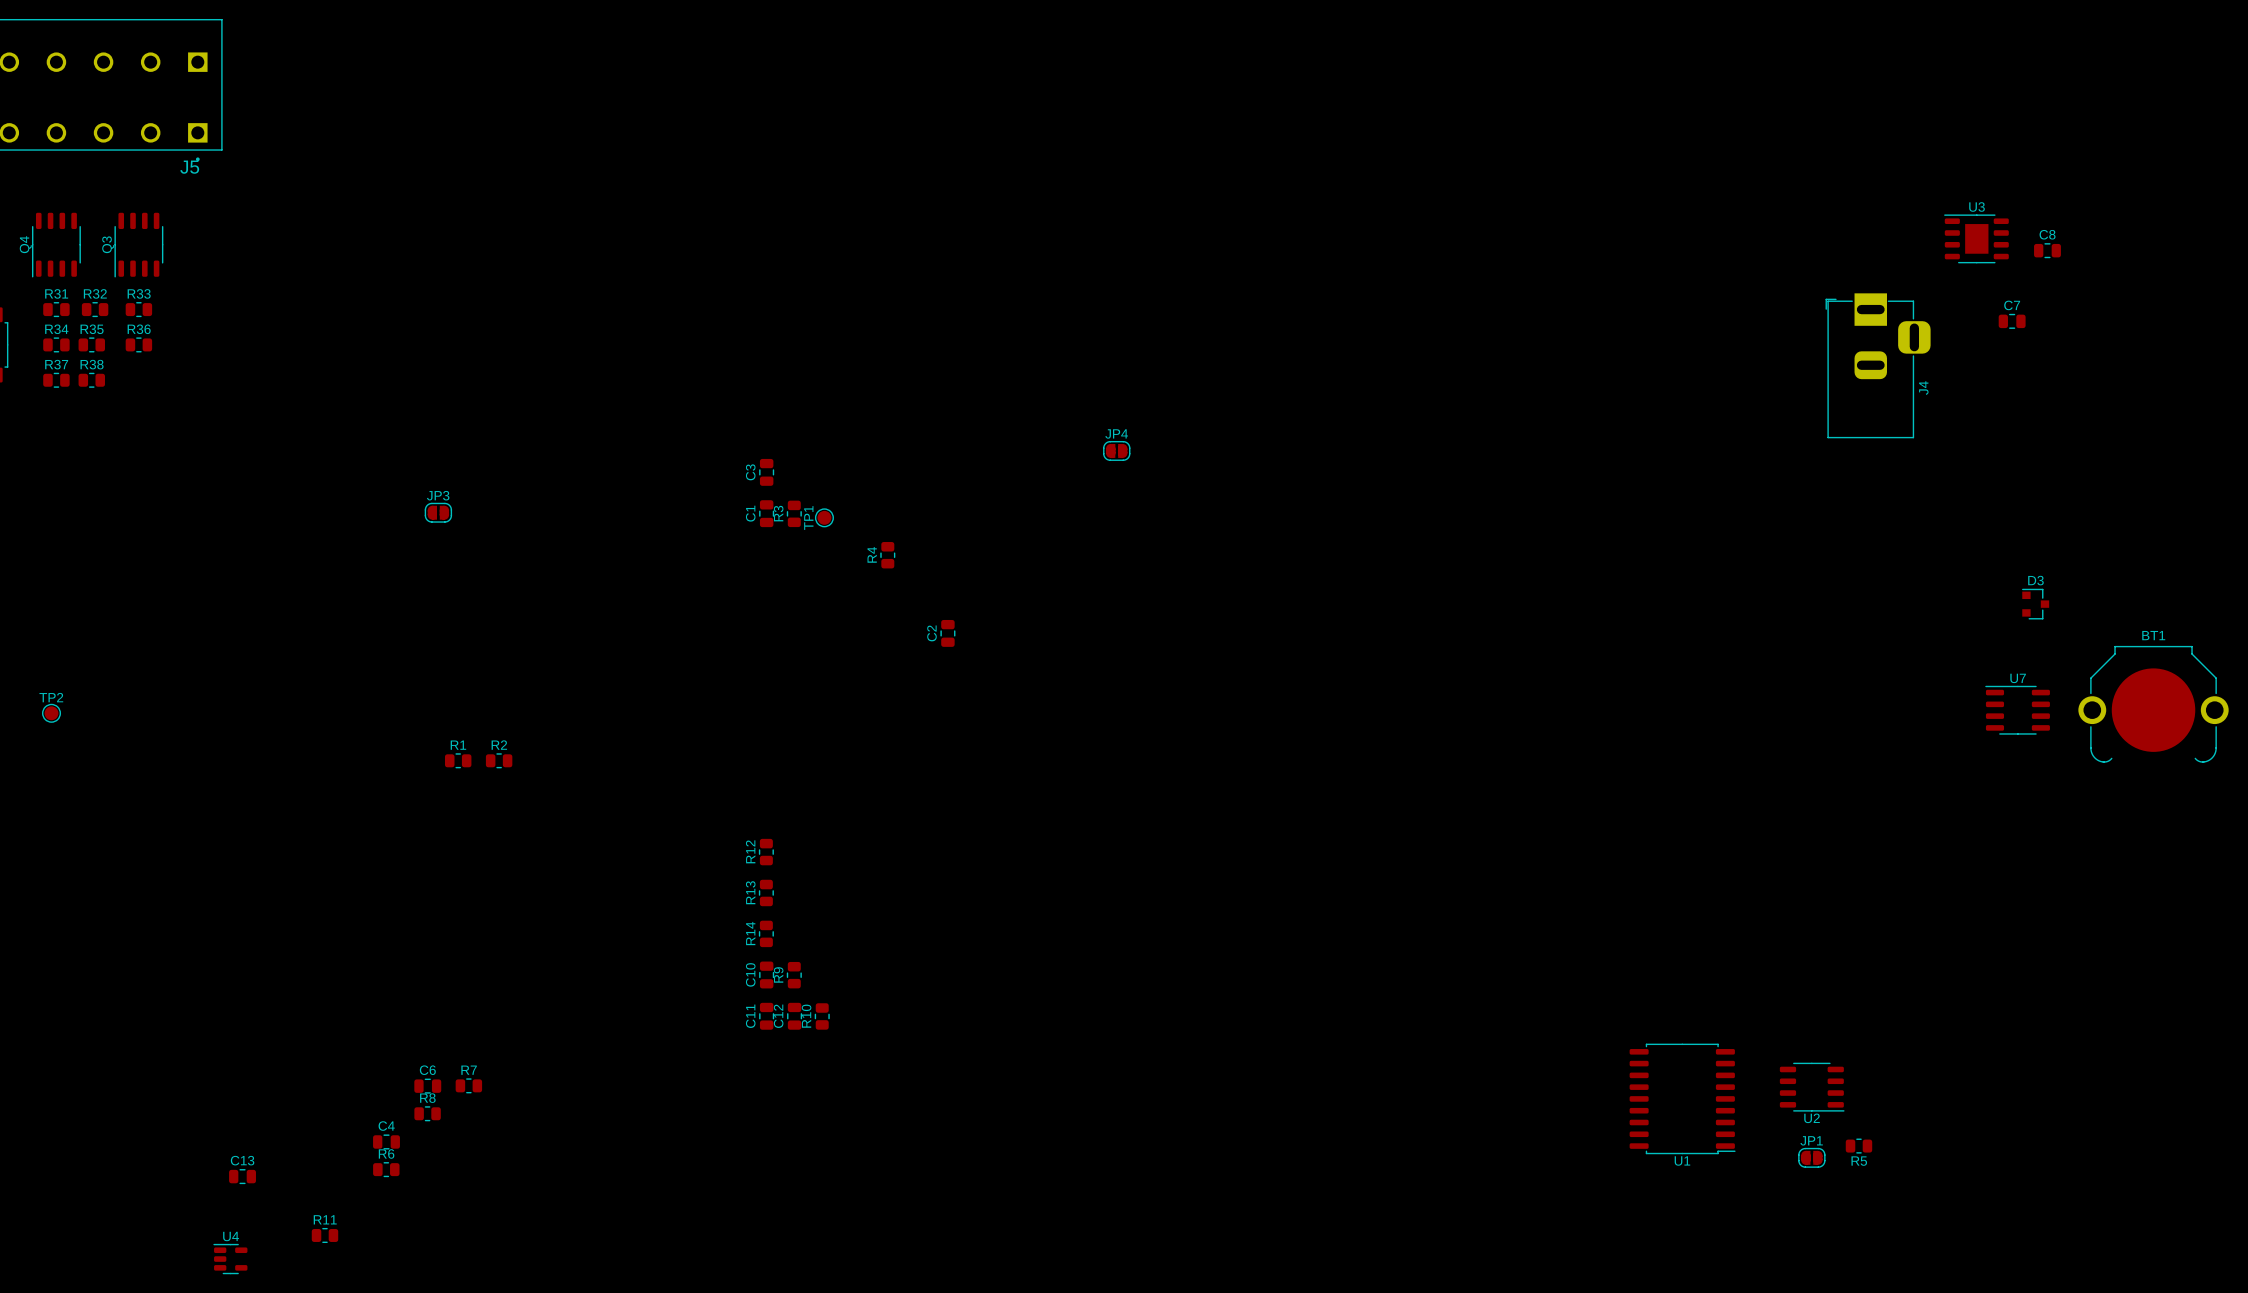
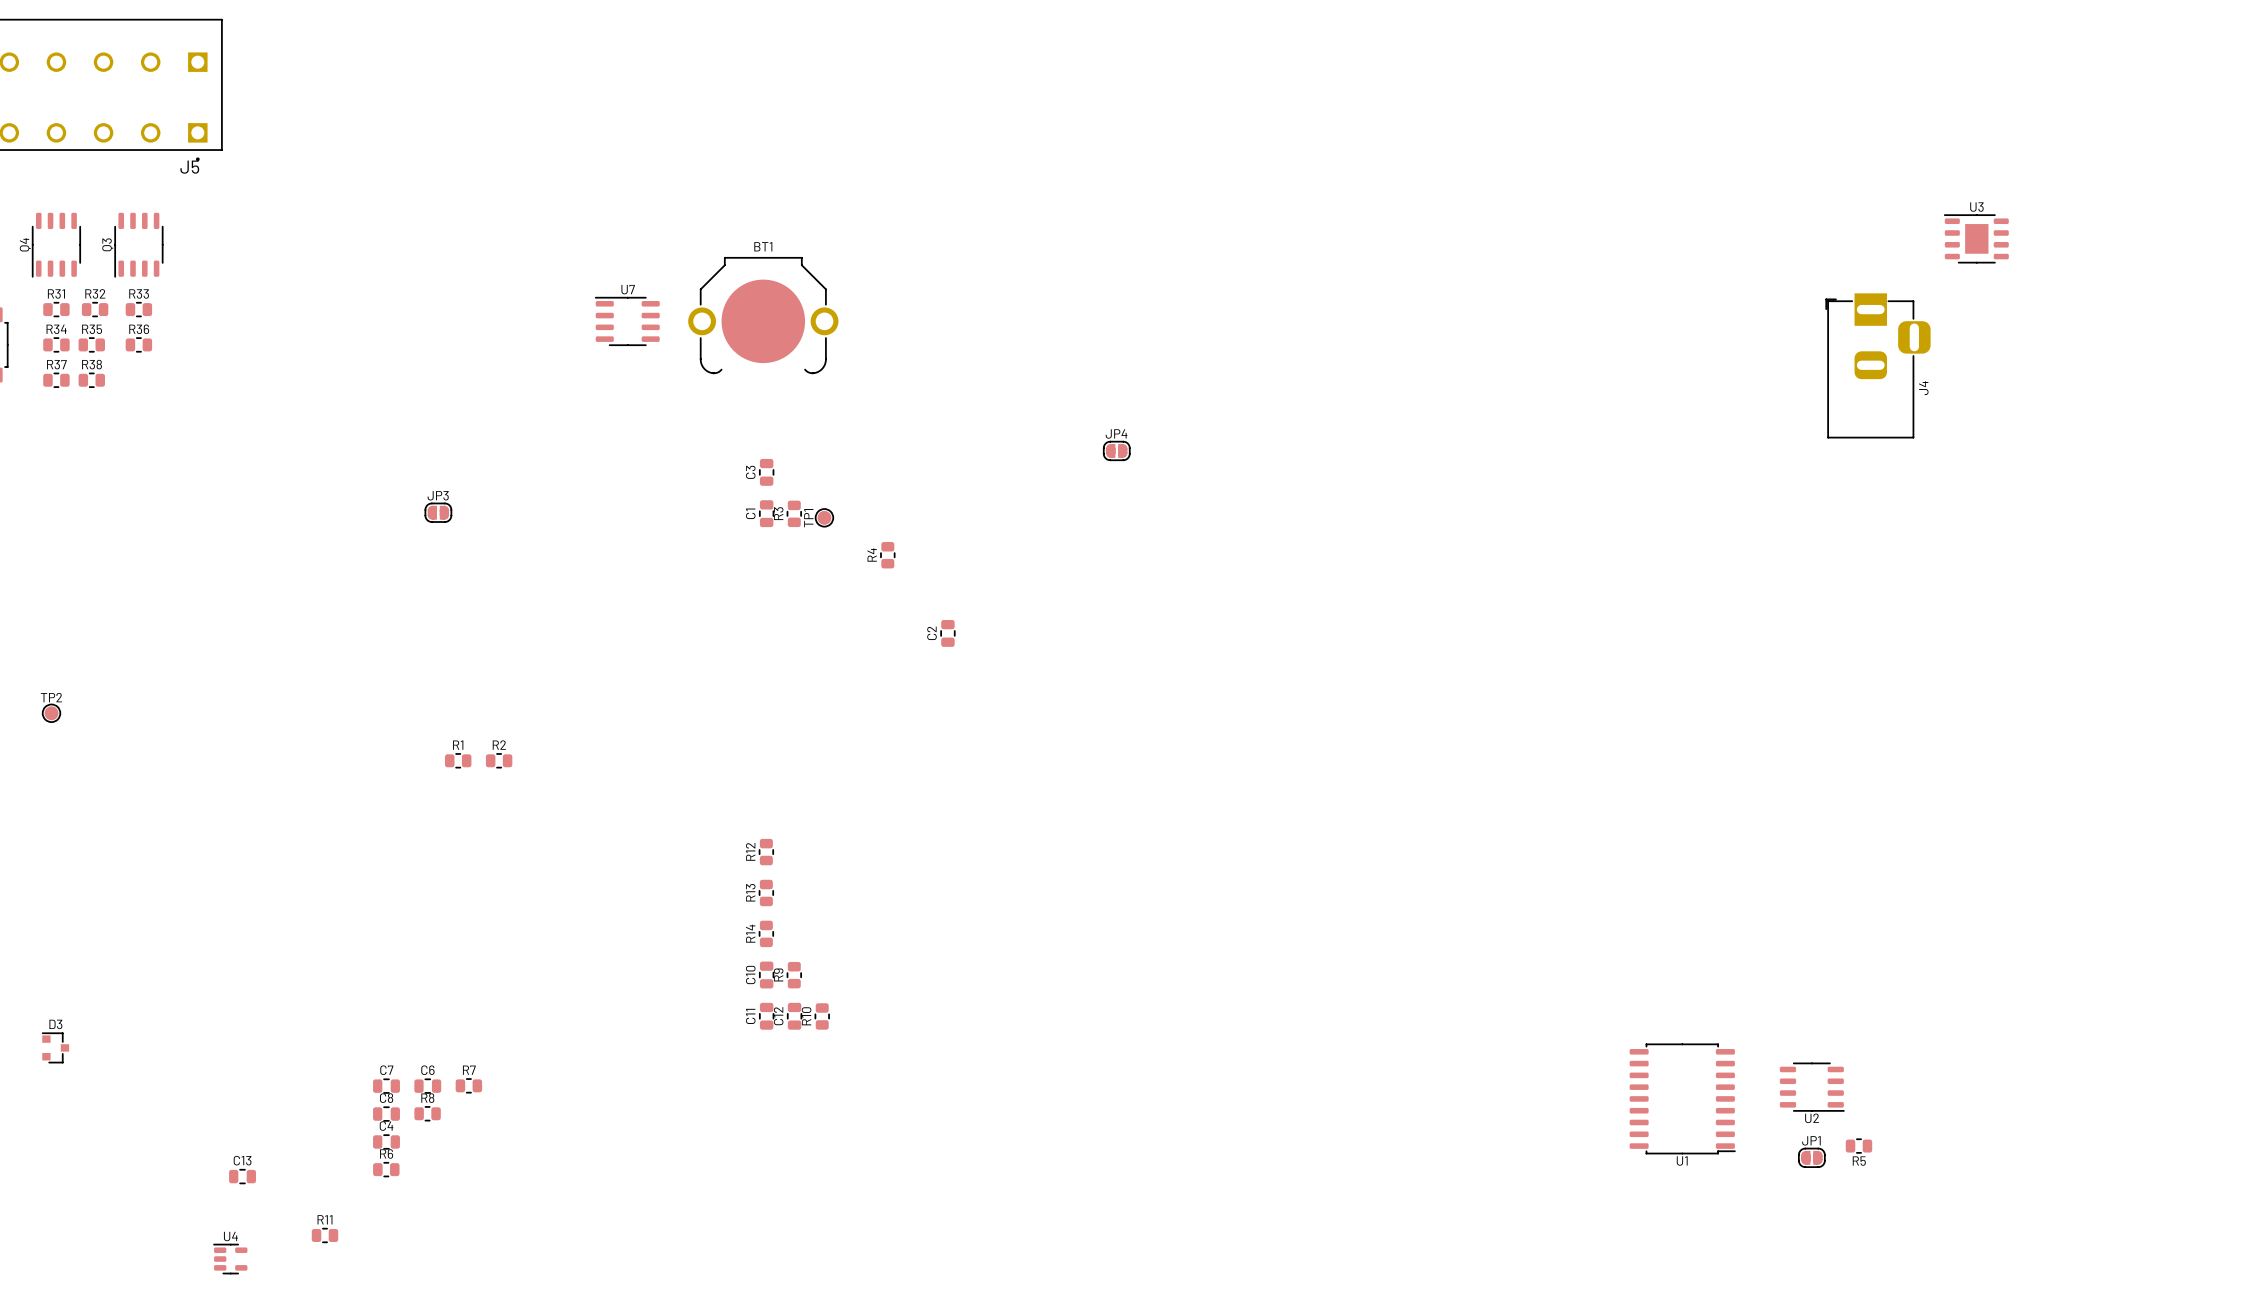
C8 position: (2047, 250) -> (386, 1114)
C7 position: (2012, 321) -> (386, 1086)
D3 position: (2035, 604) -> (55, 1047)
BT1 position: (2153, 704) -> (763, 315)
U7 position: (2017, 710) -> (627, 321)

